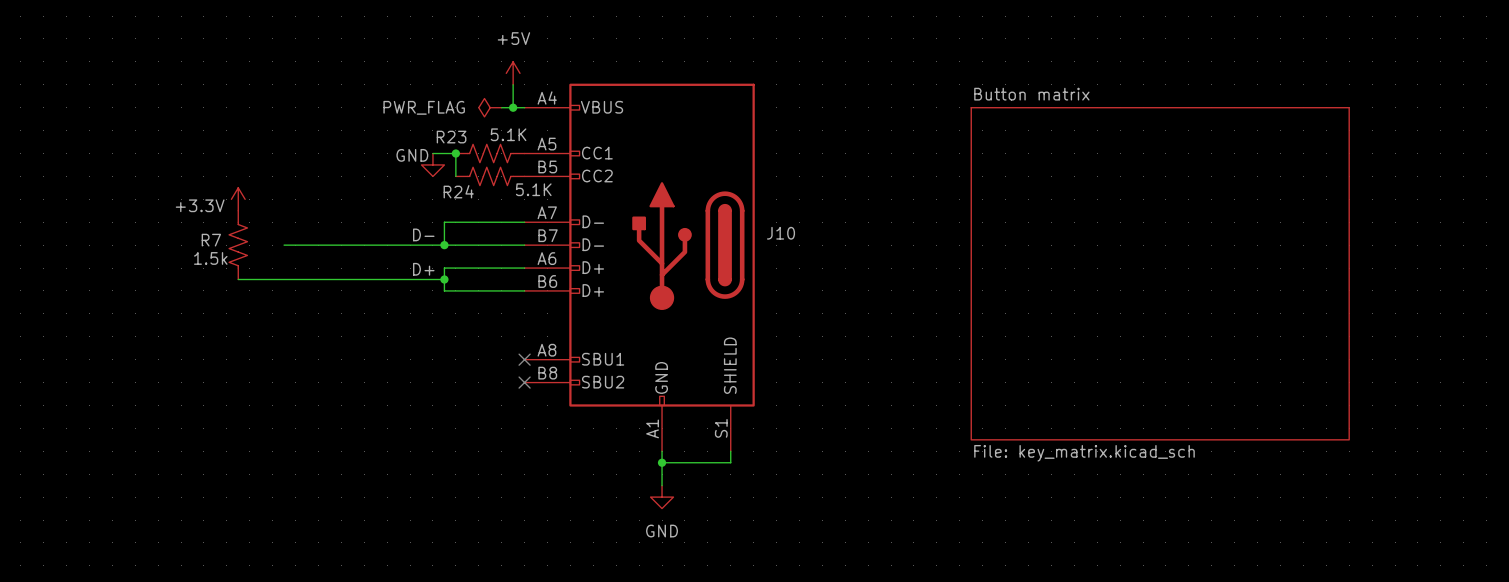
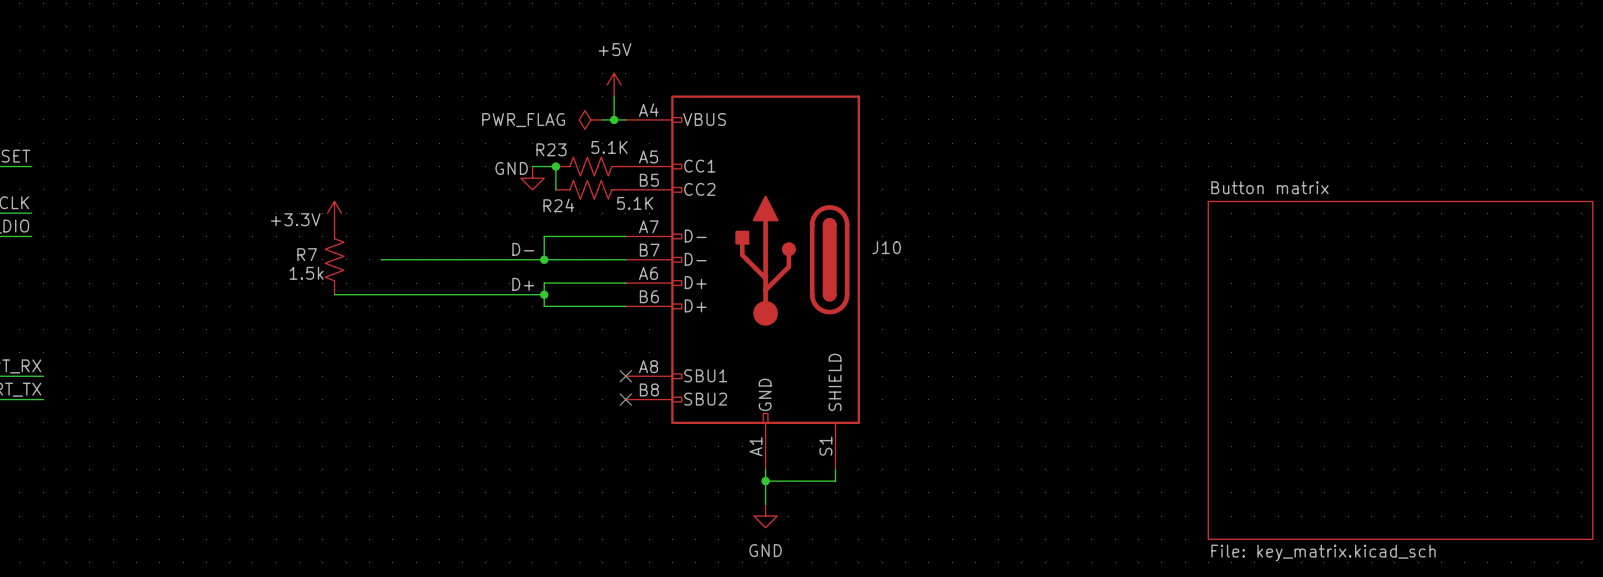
sheet Button matrix position: (1160, 273) -> (1400, 370)

